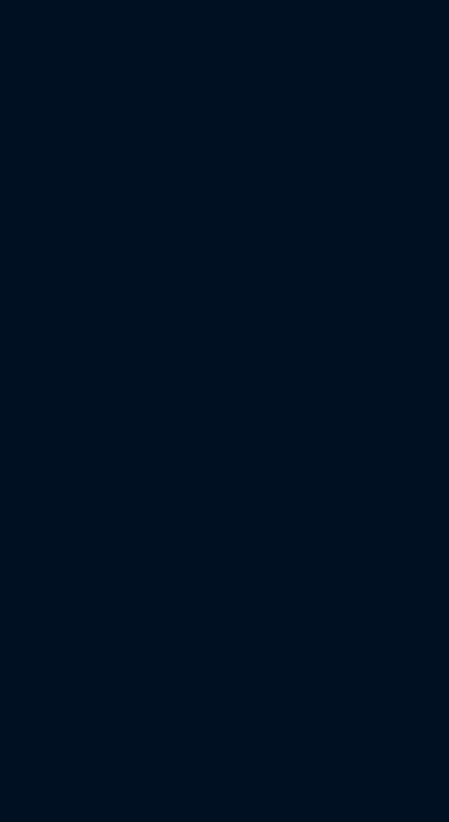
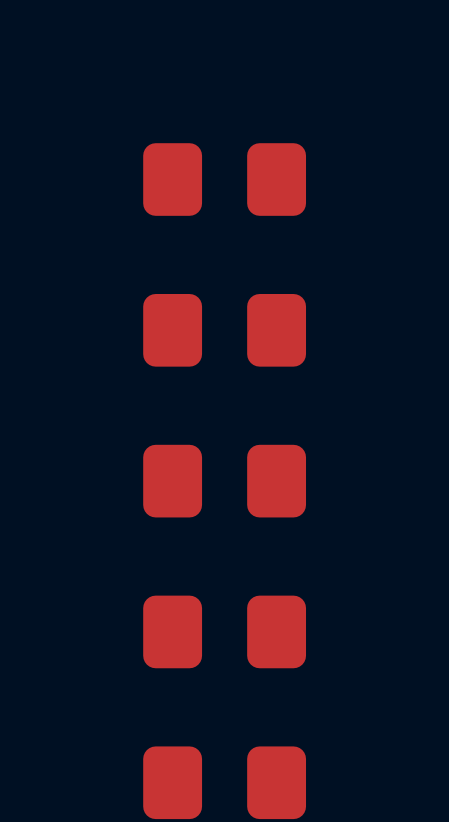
part: none -> (224, 179)
part: none -> (224, 330)
part: none -> (224, 481)
part: none -> (224, 631)
part: none -> (224, 782)

